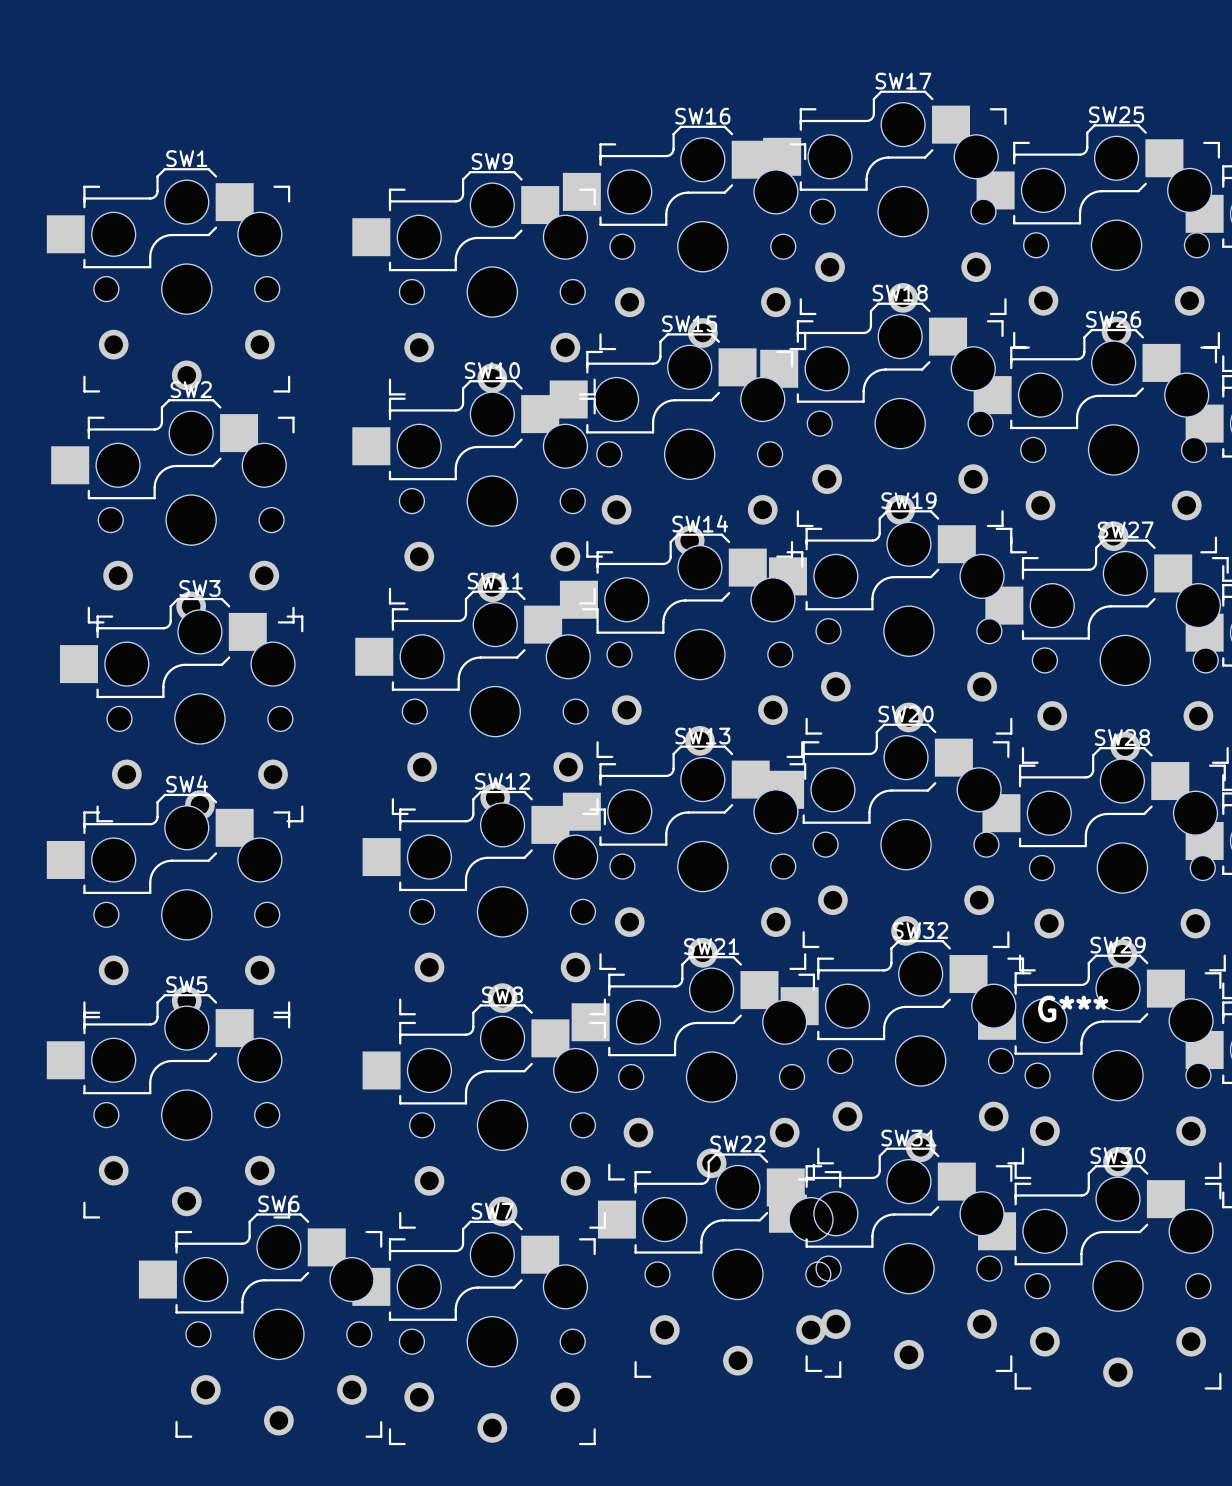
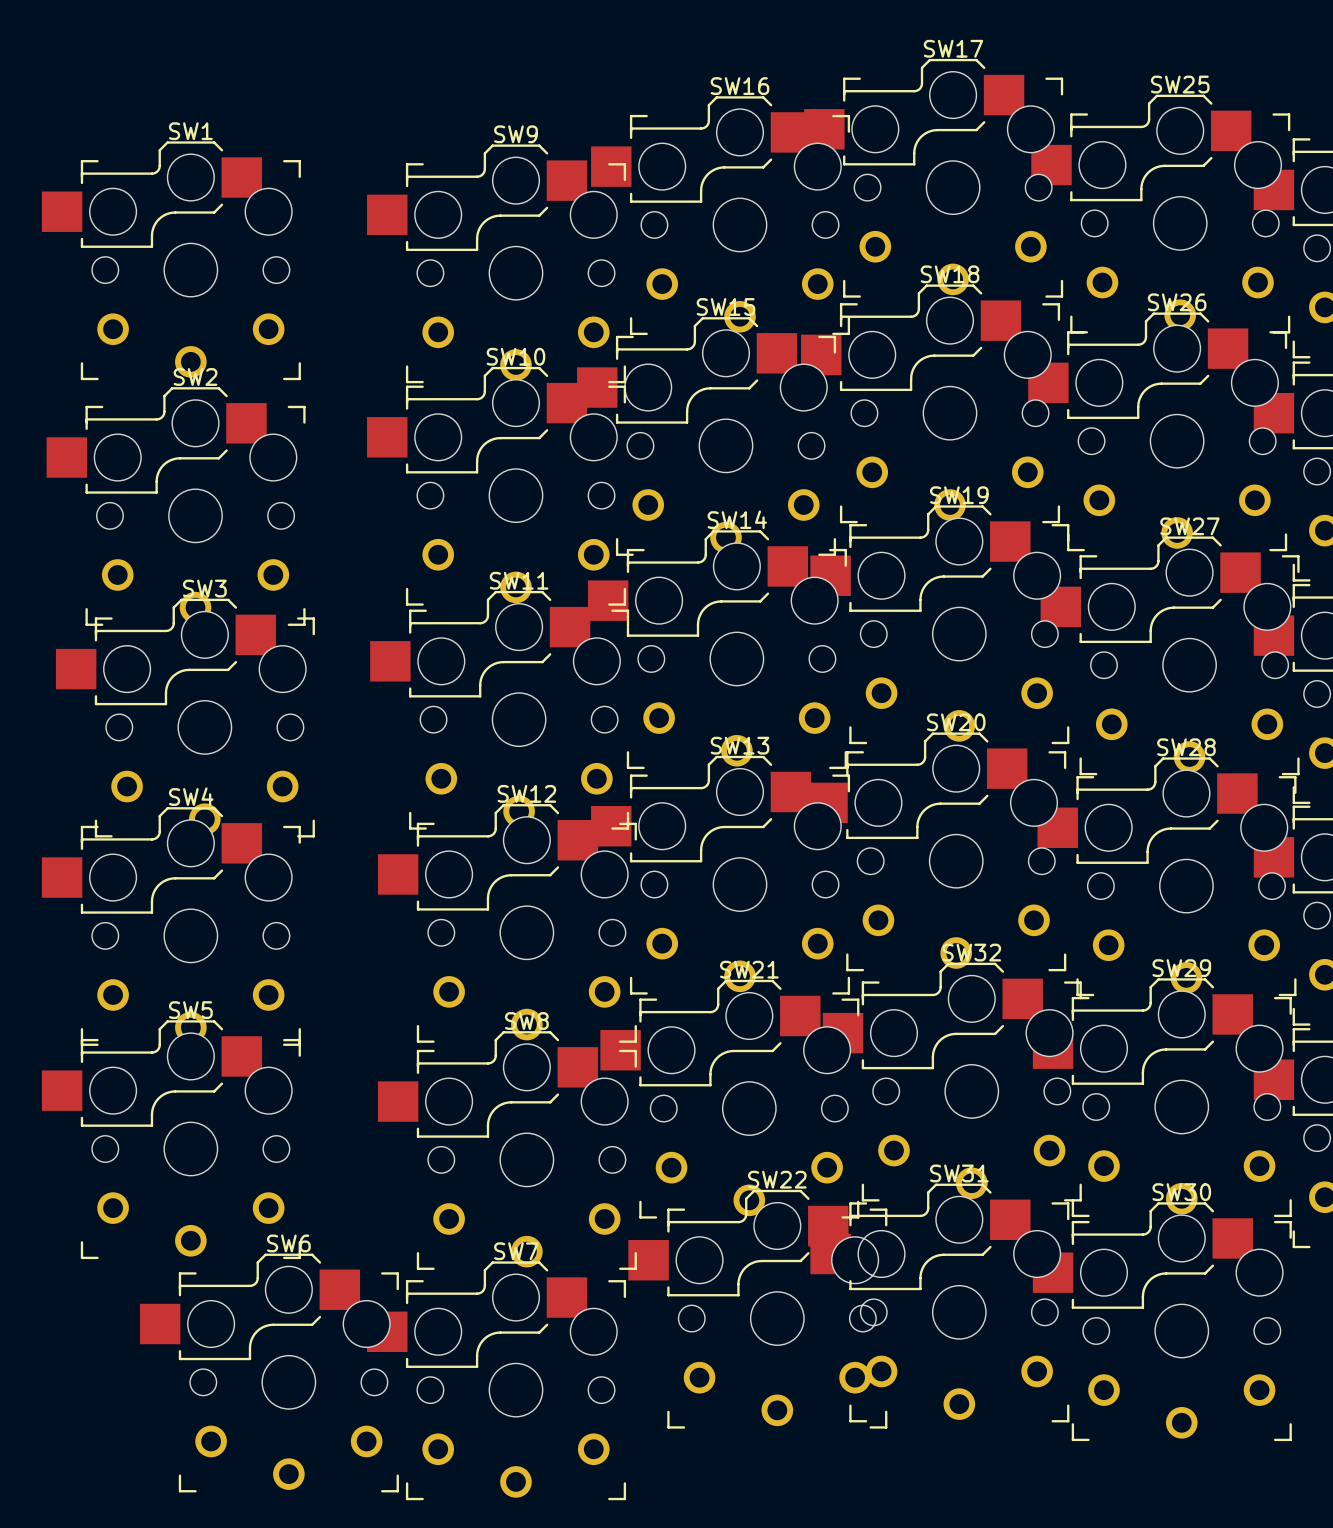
G***: (1073, 1008) -> none

